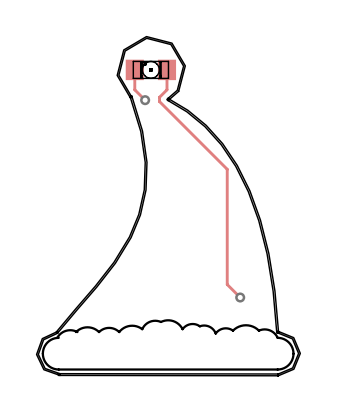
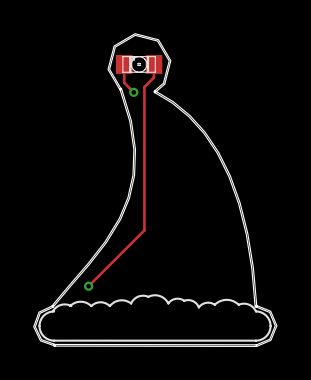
track: (166, 84) (166, 89) (159, 97) (159, 101) (227, 169) (227, 284) (240, 297) -> (153, 77) (144, 87) (144, 230) (88, 286)
via: (240, 297) -> none
via: none -> (88, 286)

